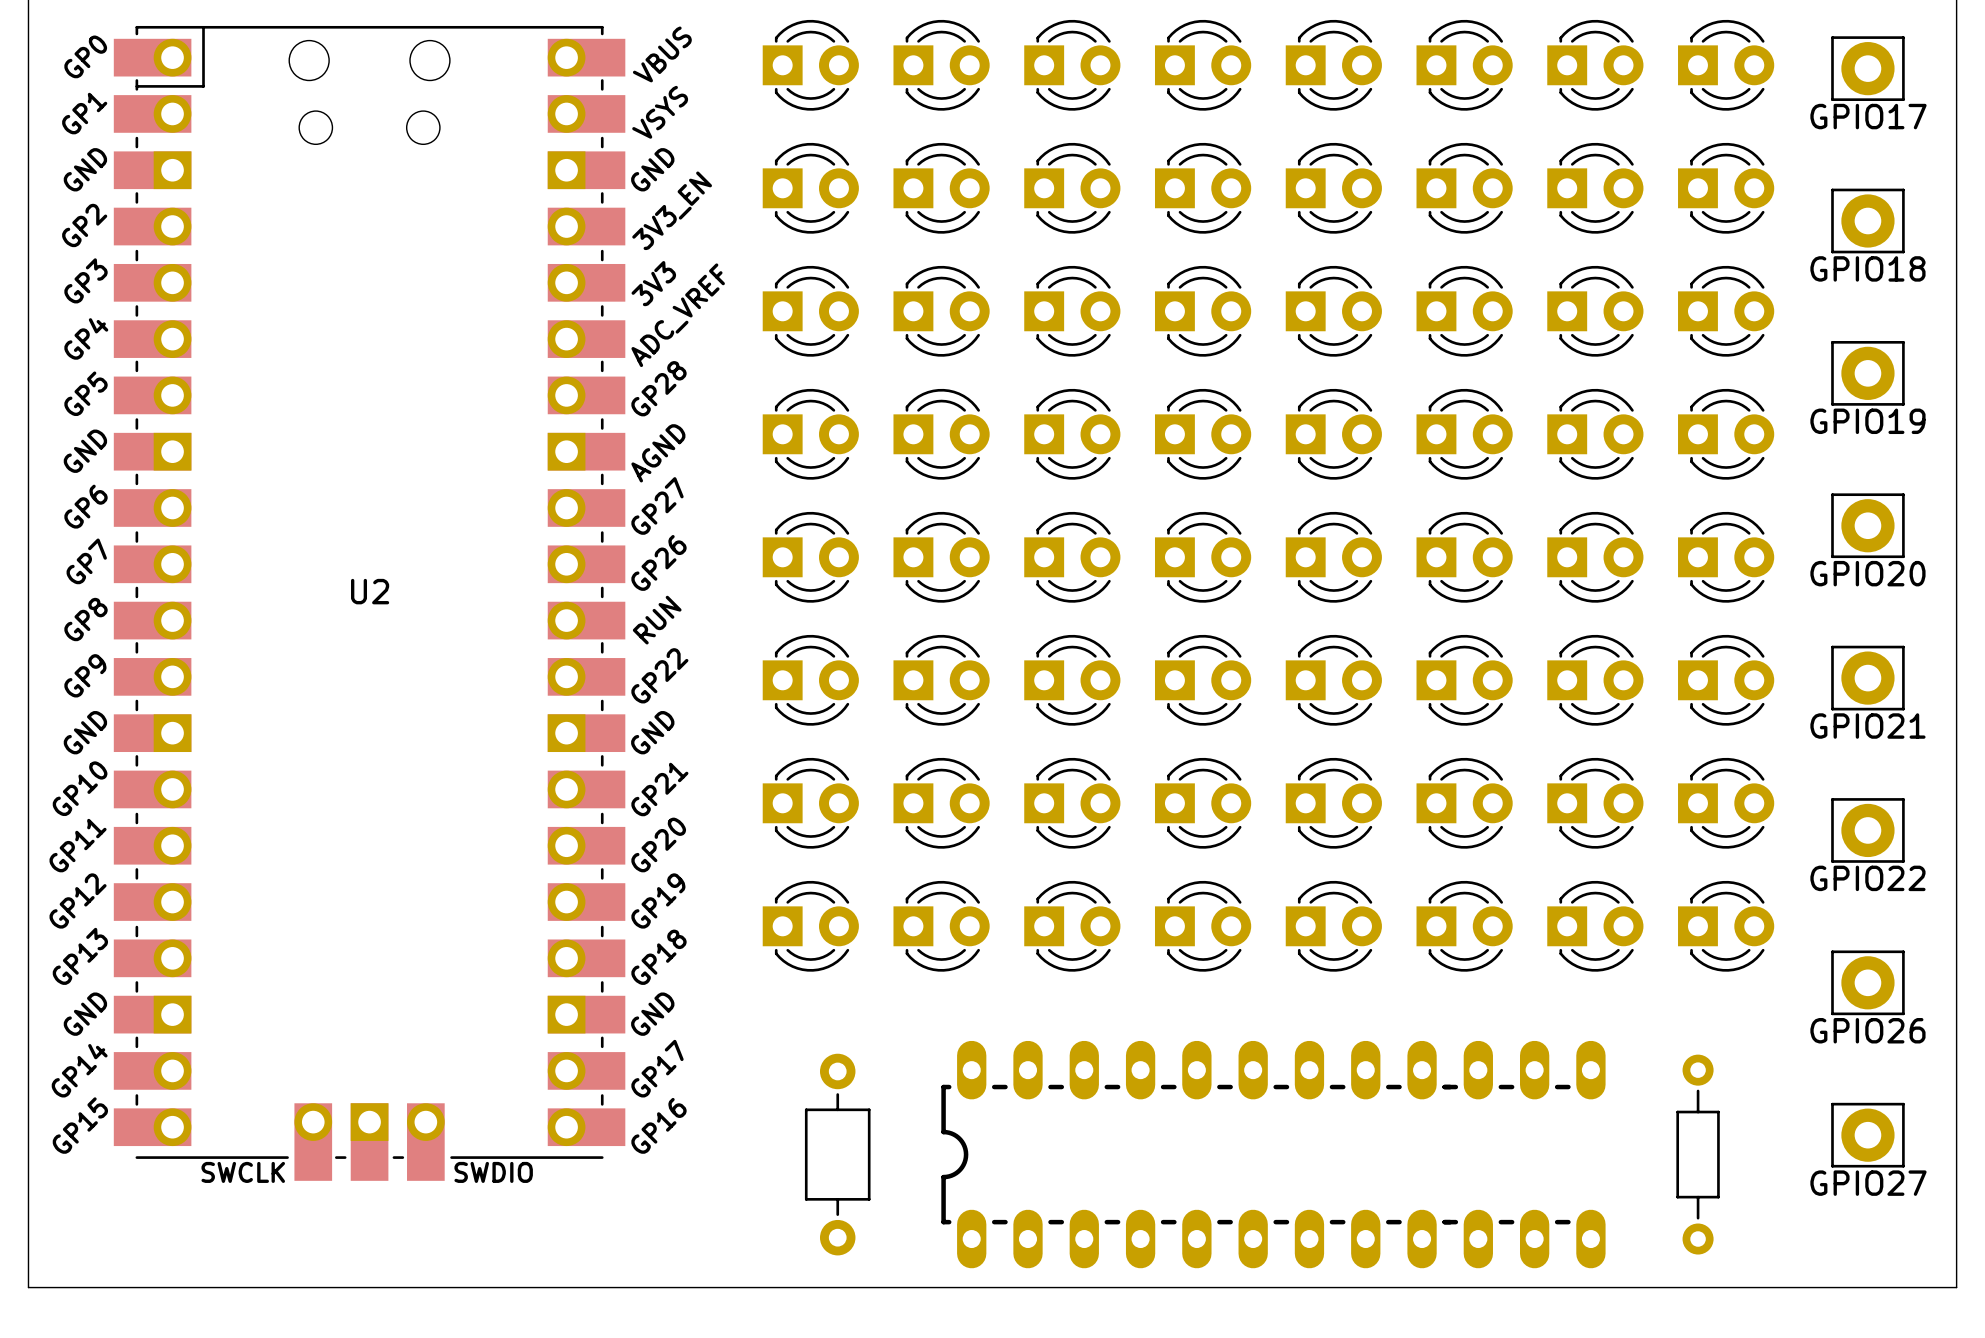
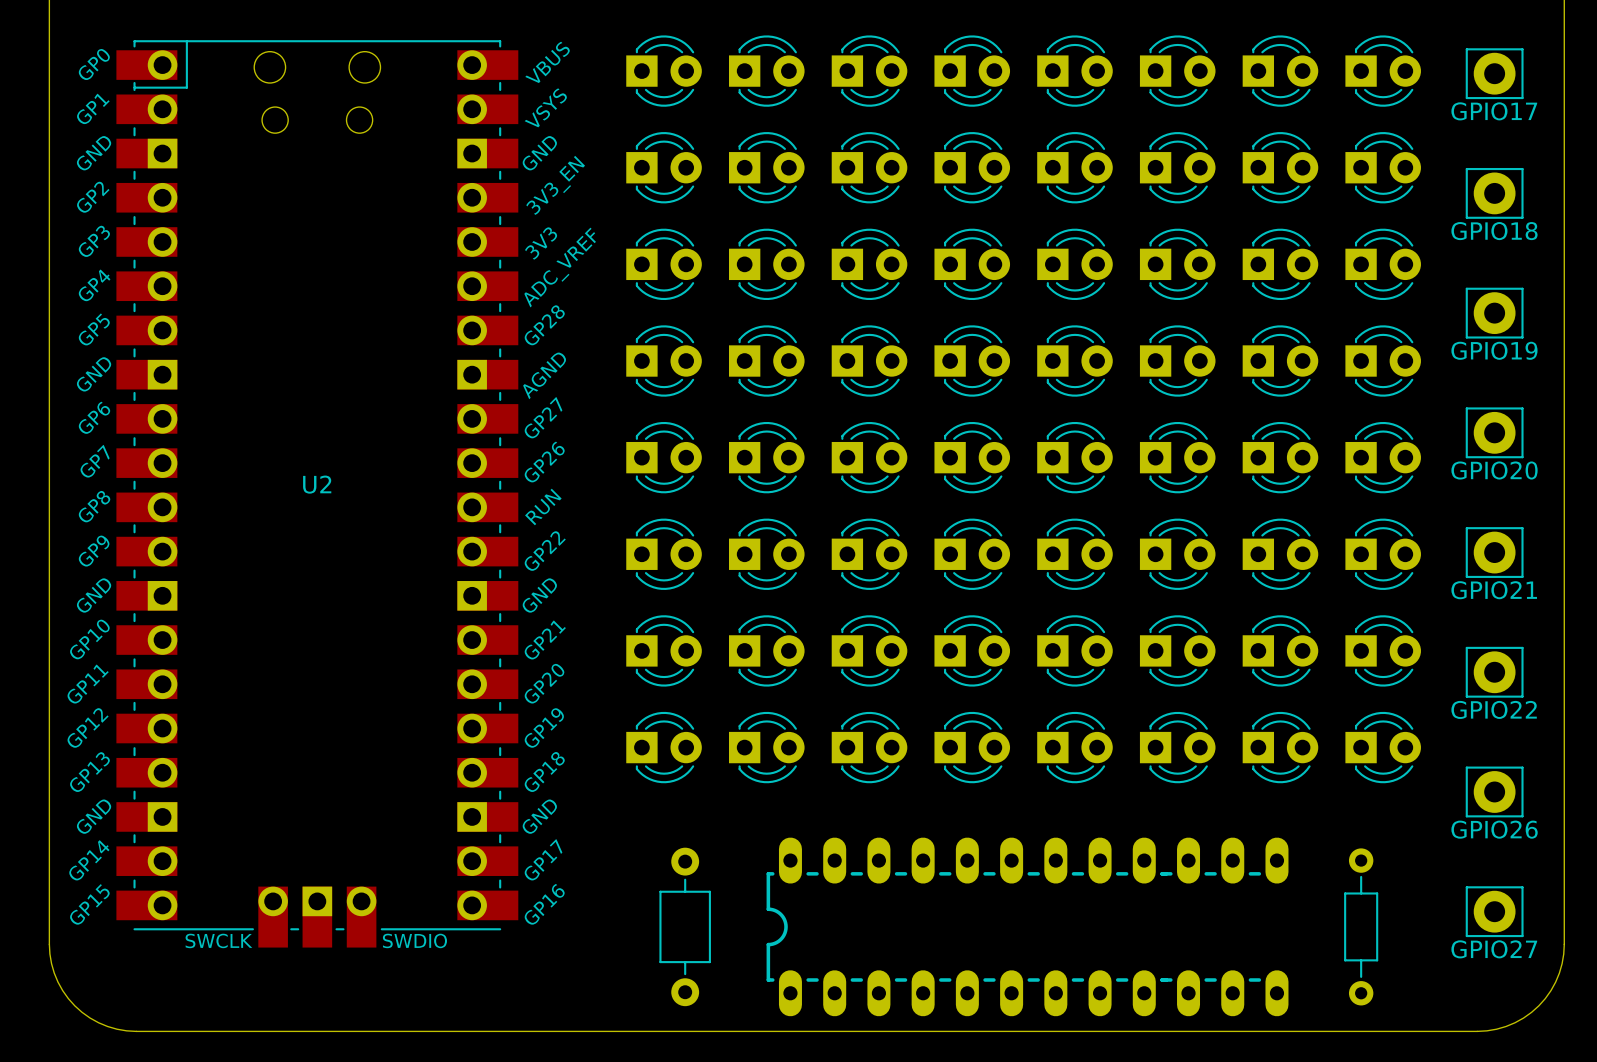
board edge: (28, 1176) (28, 1287) (139, 1287) -> (49, 944) (54, 973) (62, 990) (74, 1005) (90, 1018) (107, 1026) (136, 1031)
board edge: (1956, 1176) (1956, 1287) (1845, 1287) -> (1564, 944) (1562, 963) (1555, 982) (1538, 1005) (1523, 1018) (1505, 1026) (1477, 1031)

